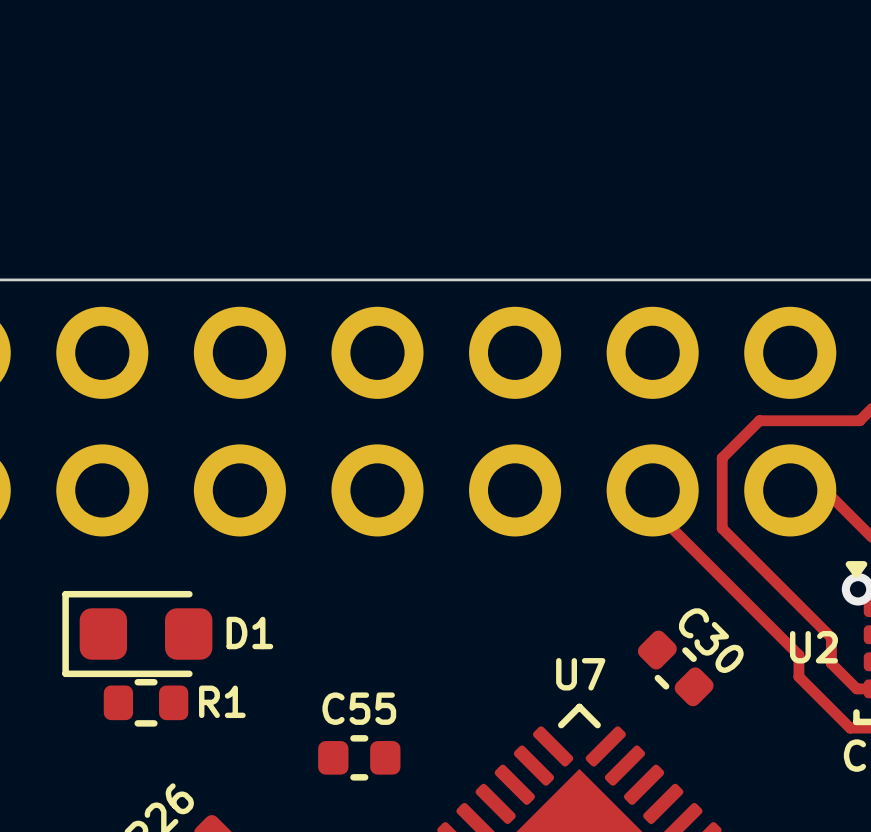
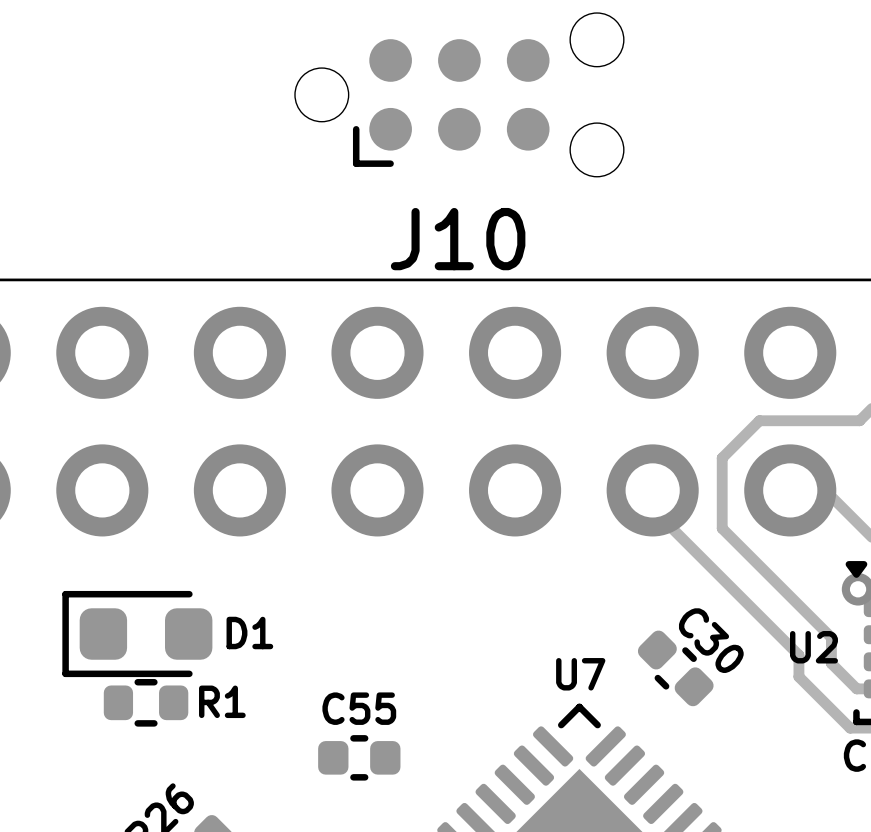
J10: none -> (459, 94)

